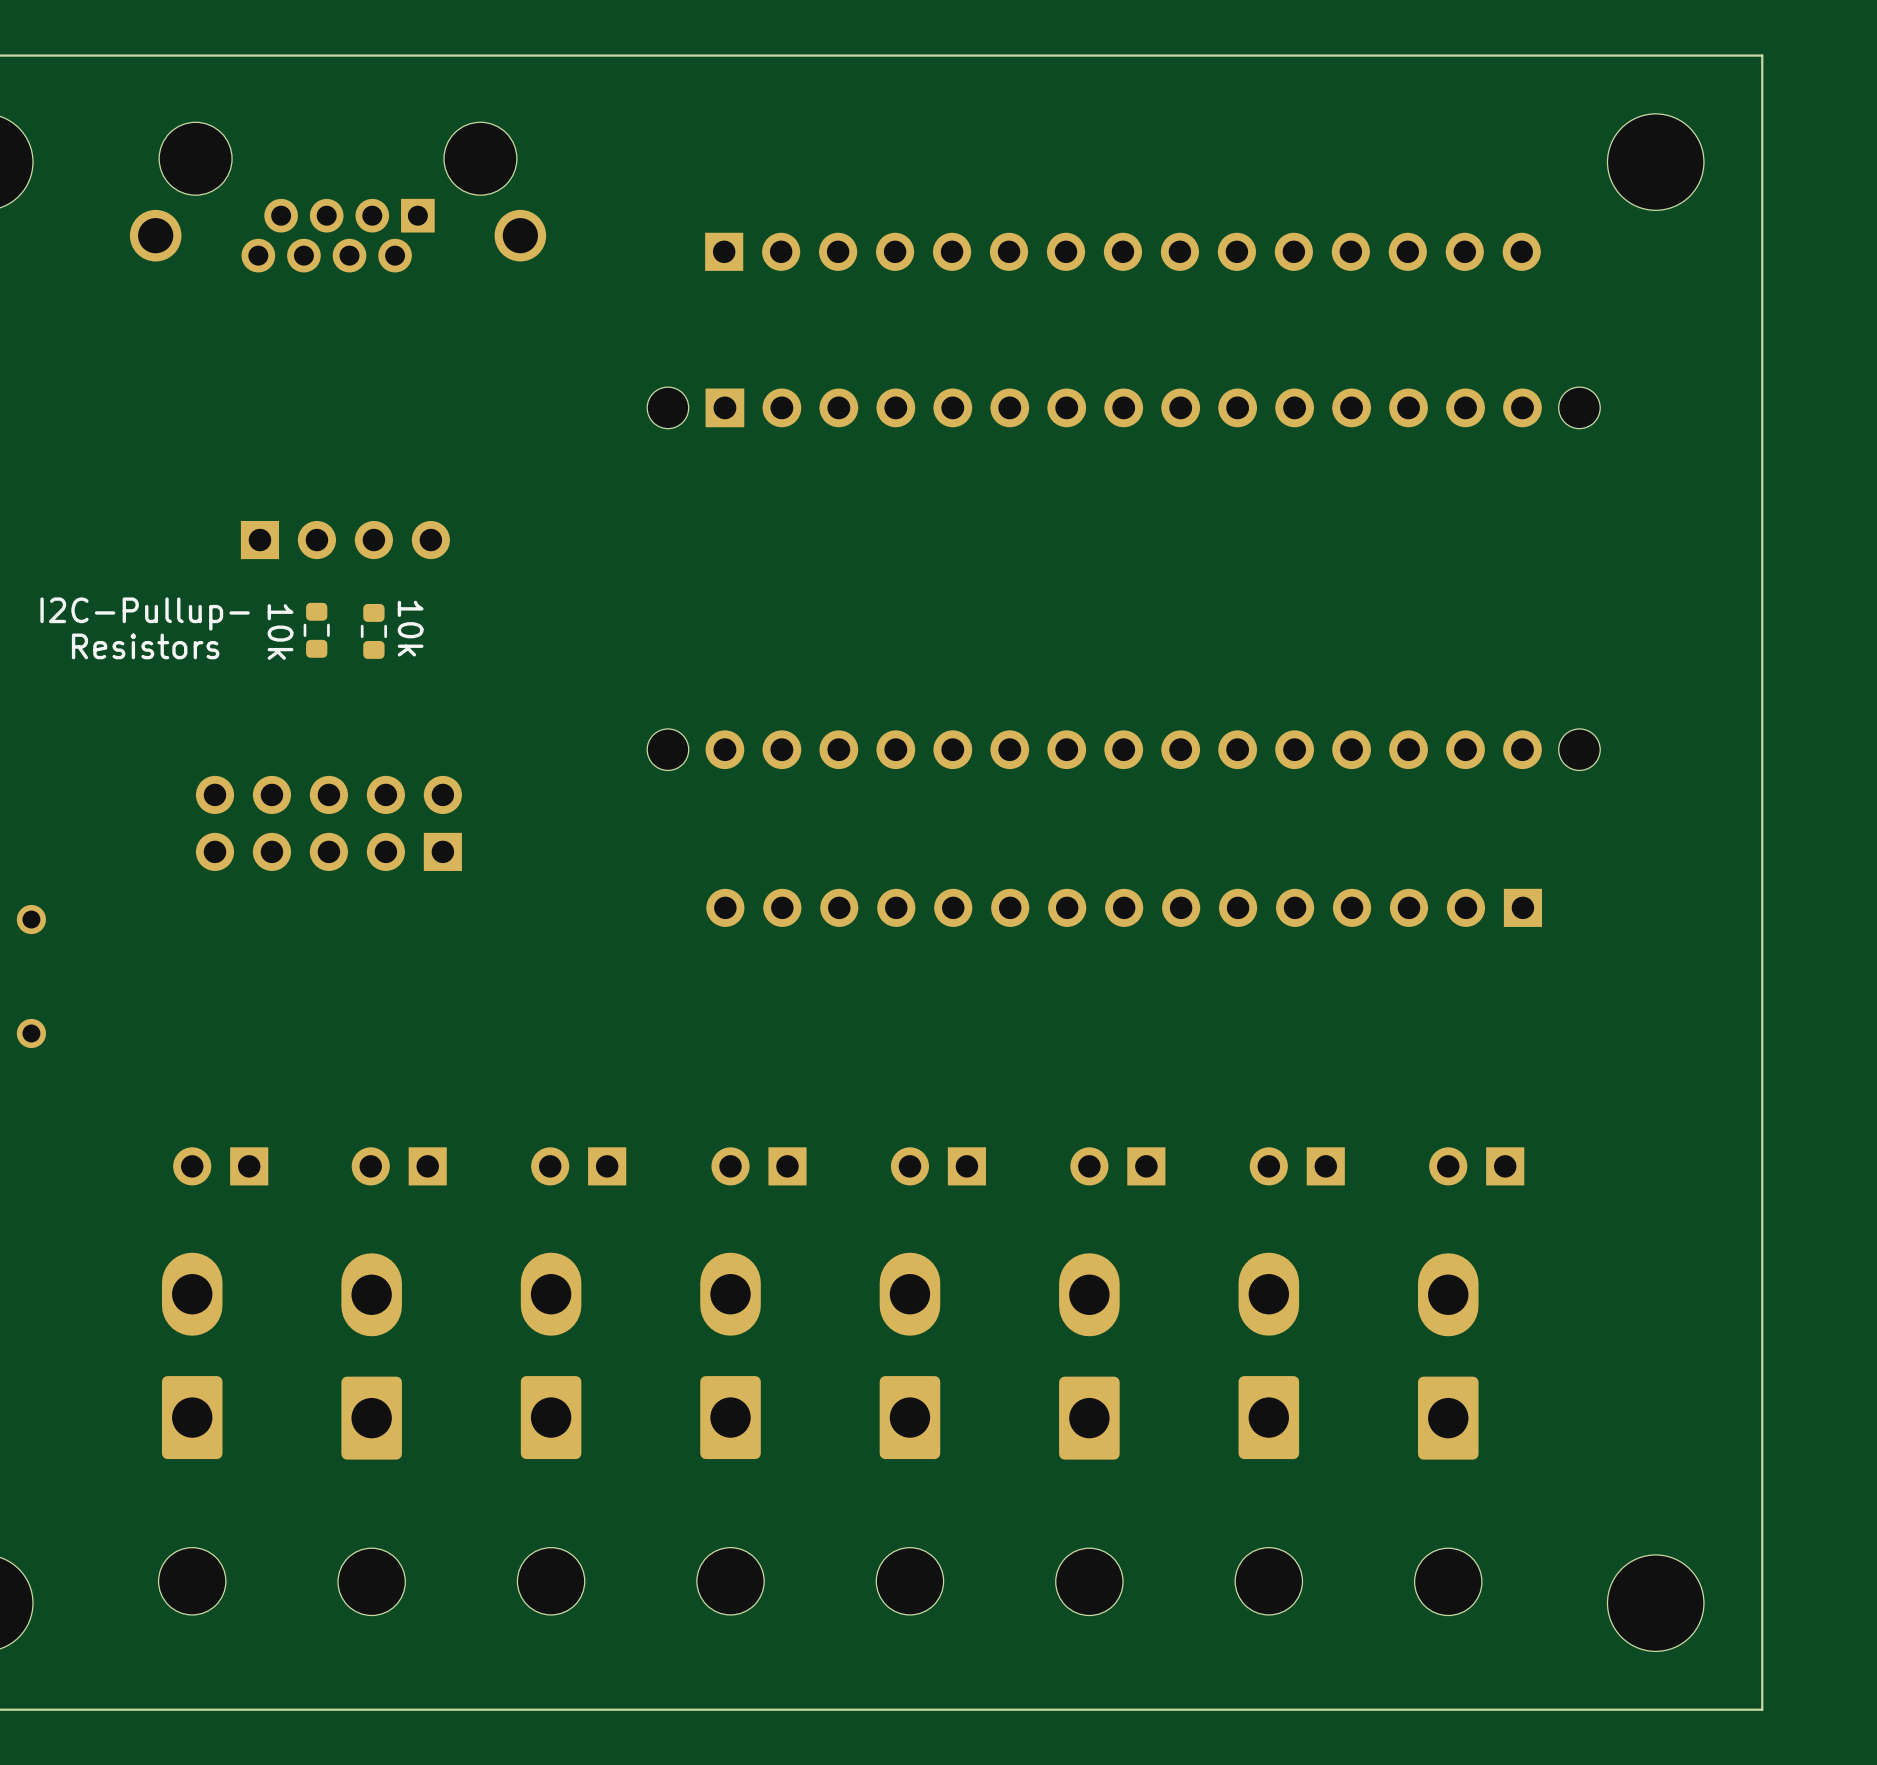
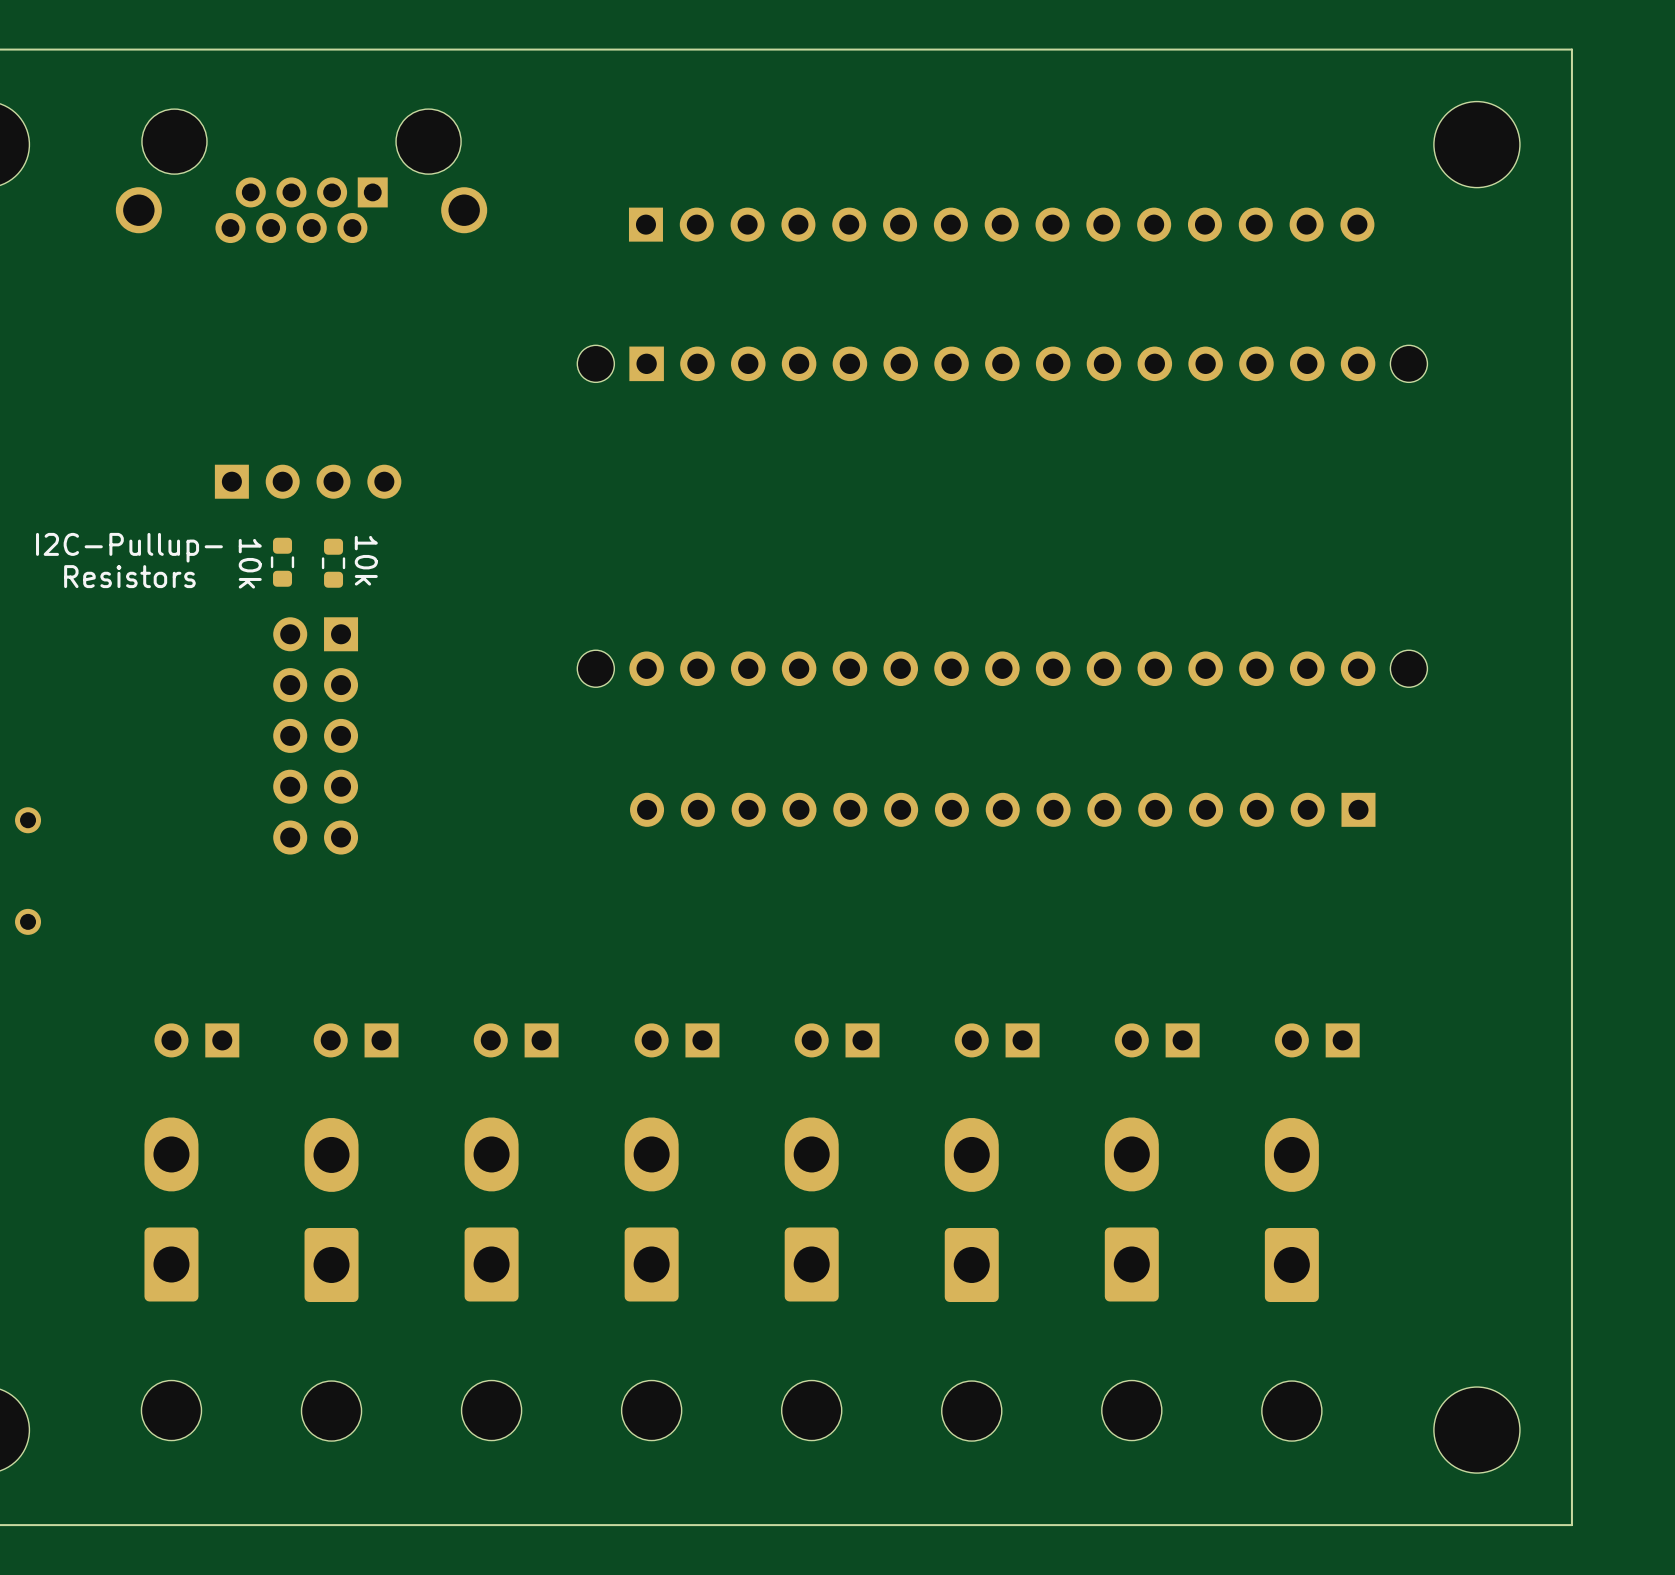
part rotation: 0° (328, 823) -> 90° counterclockwise (315, 735)

